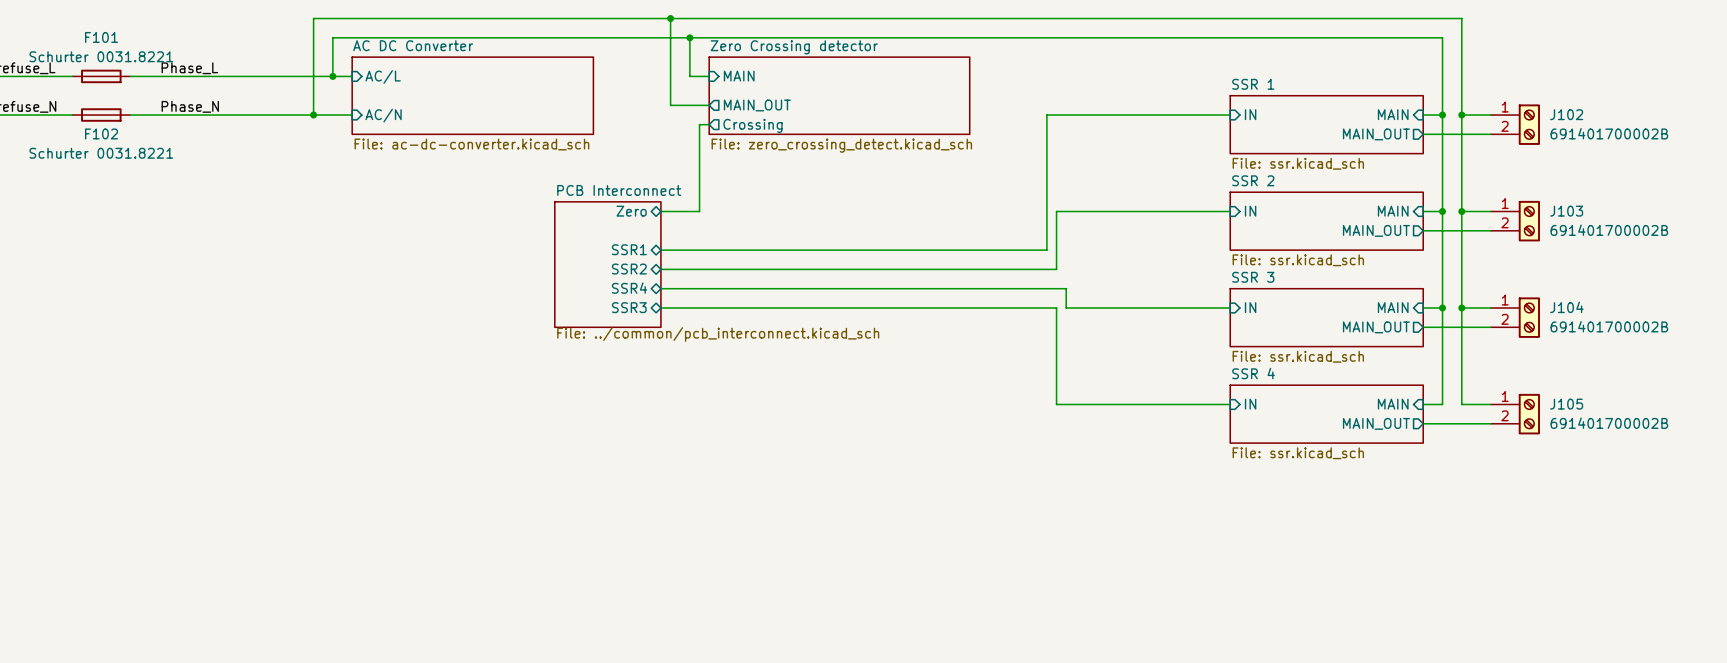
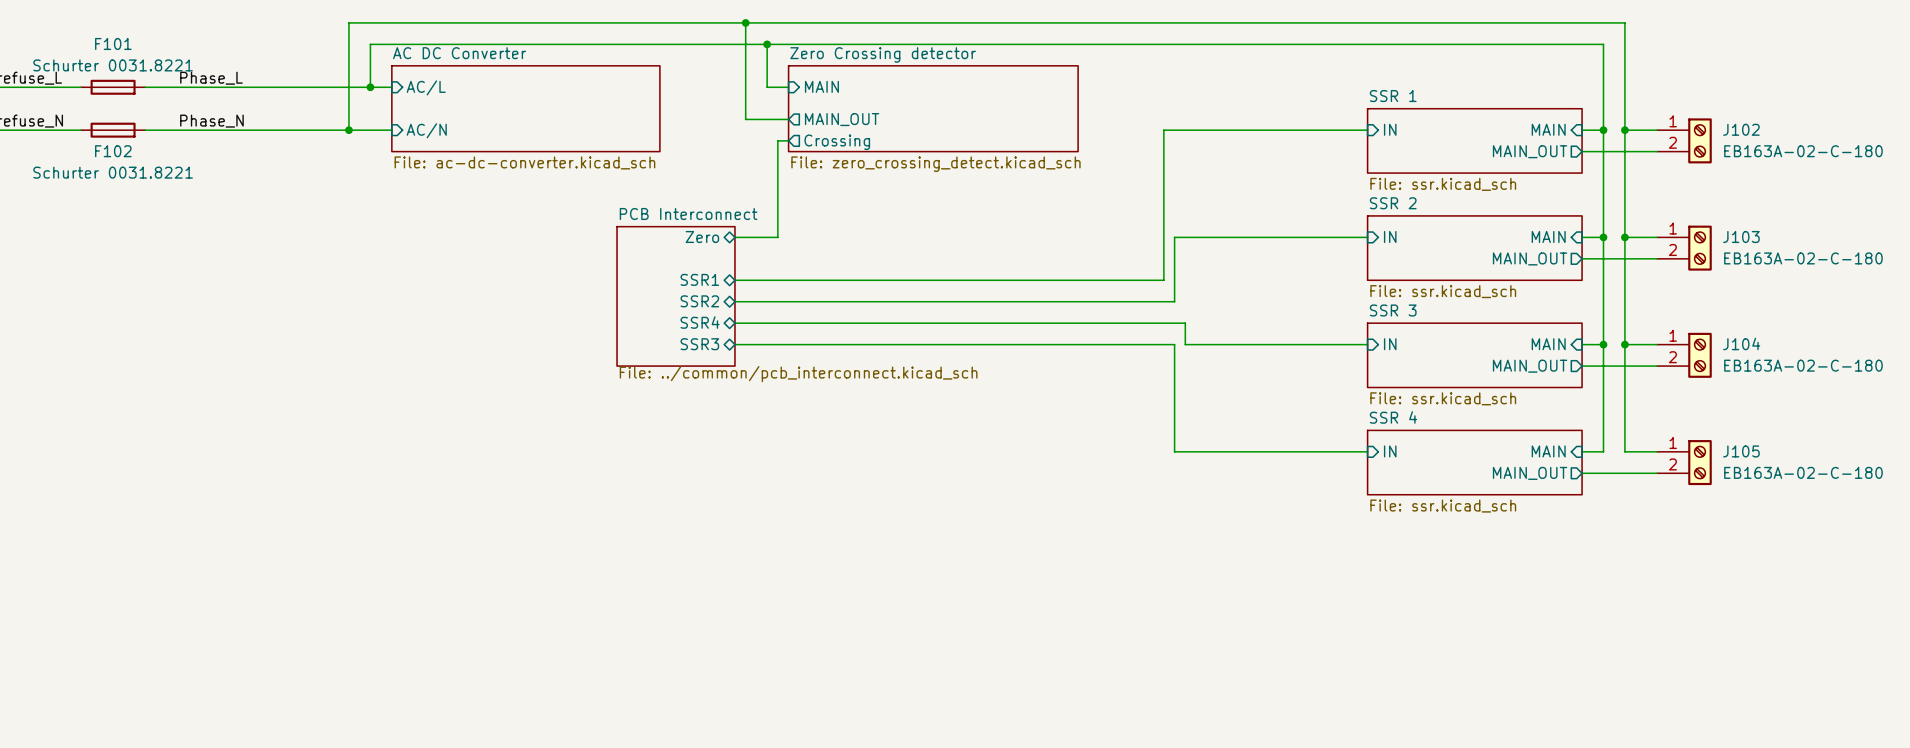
J102 value: 691401700002B (1609, 133) -> EB163A-02-C-180 (1803, 151)
J103 value: 691401700002B (1609, 230) -> EB163A-02-C-180 (1803, 258)
J104 value: 691401700002B (1609, 326) -> EB163A-02-C-180 (1803, 365)
J105 value: 691401700002B (1609, 423) -> EB163A-02-C-180 (1803, 472)

